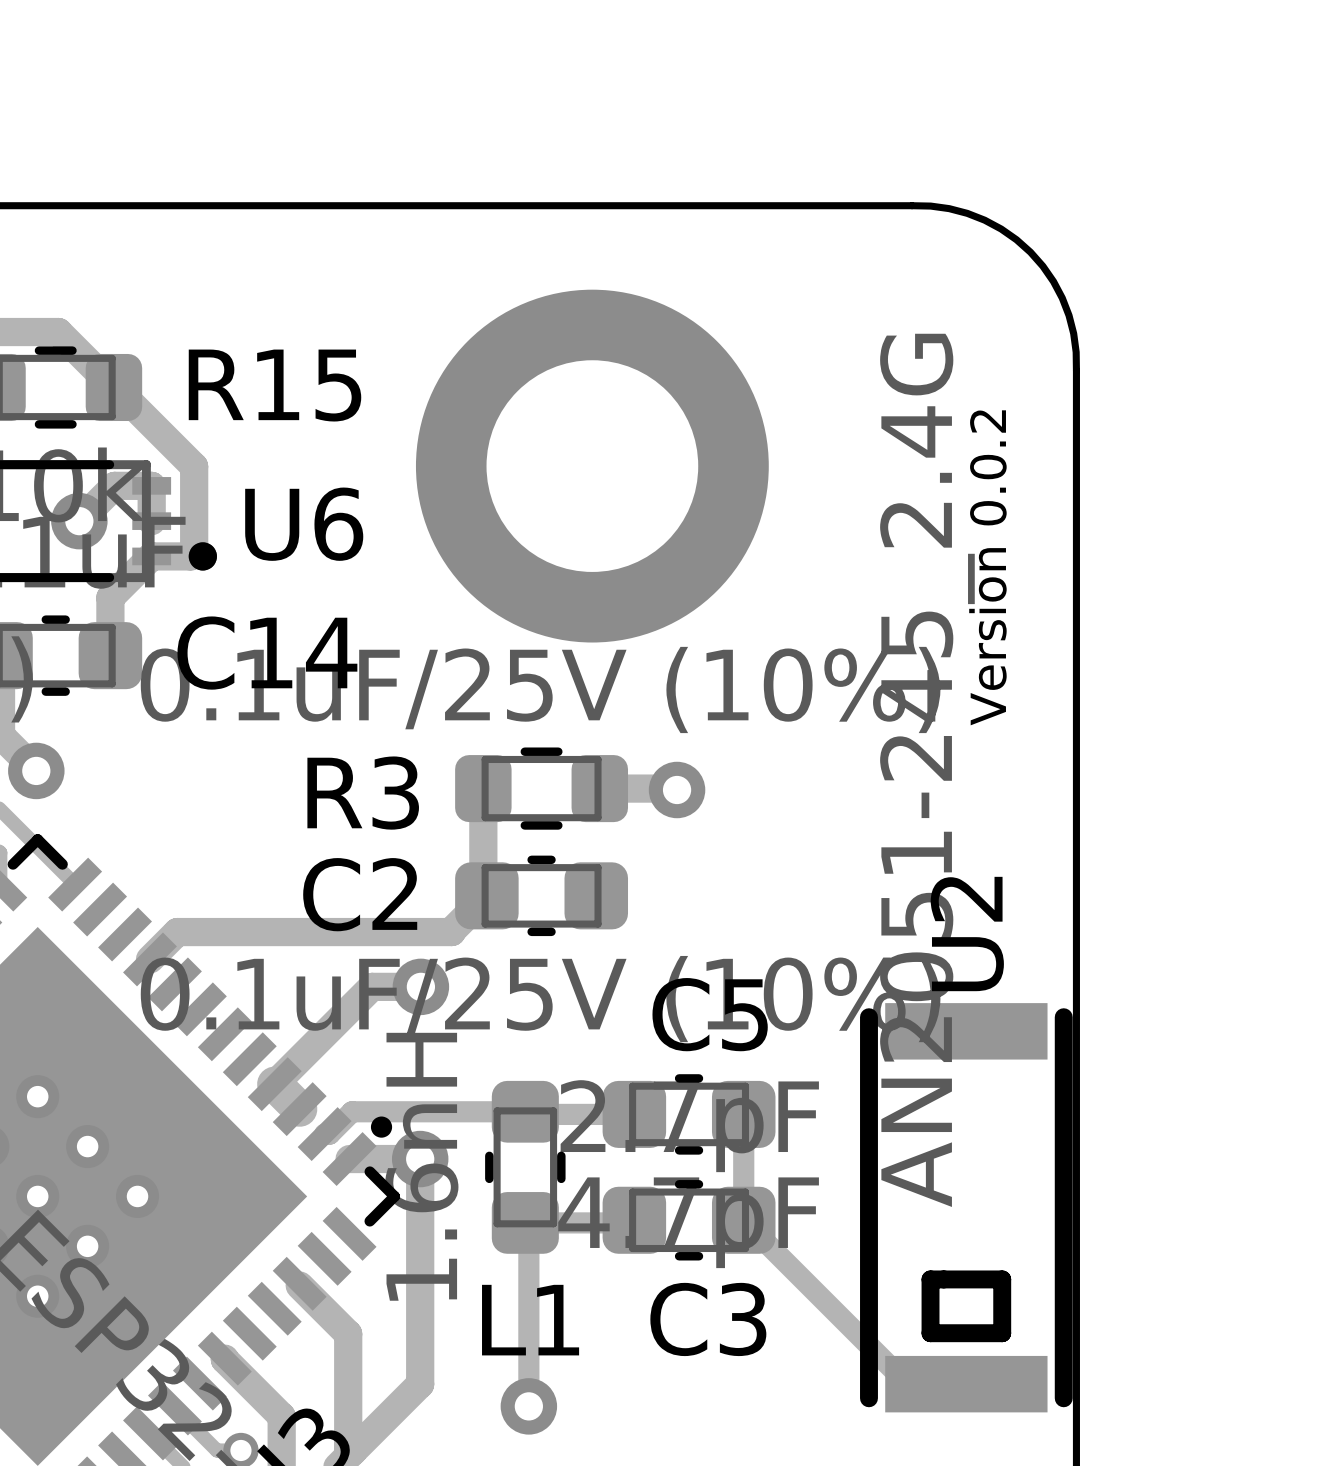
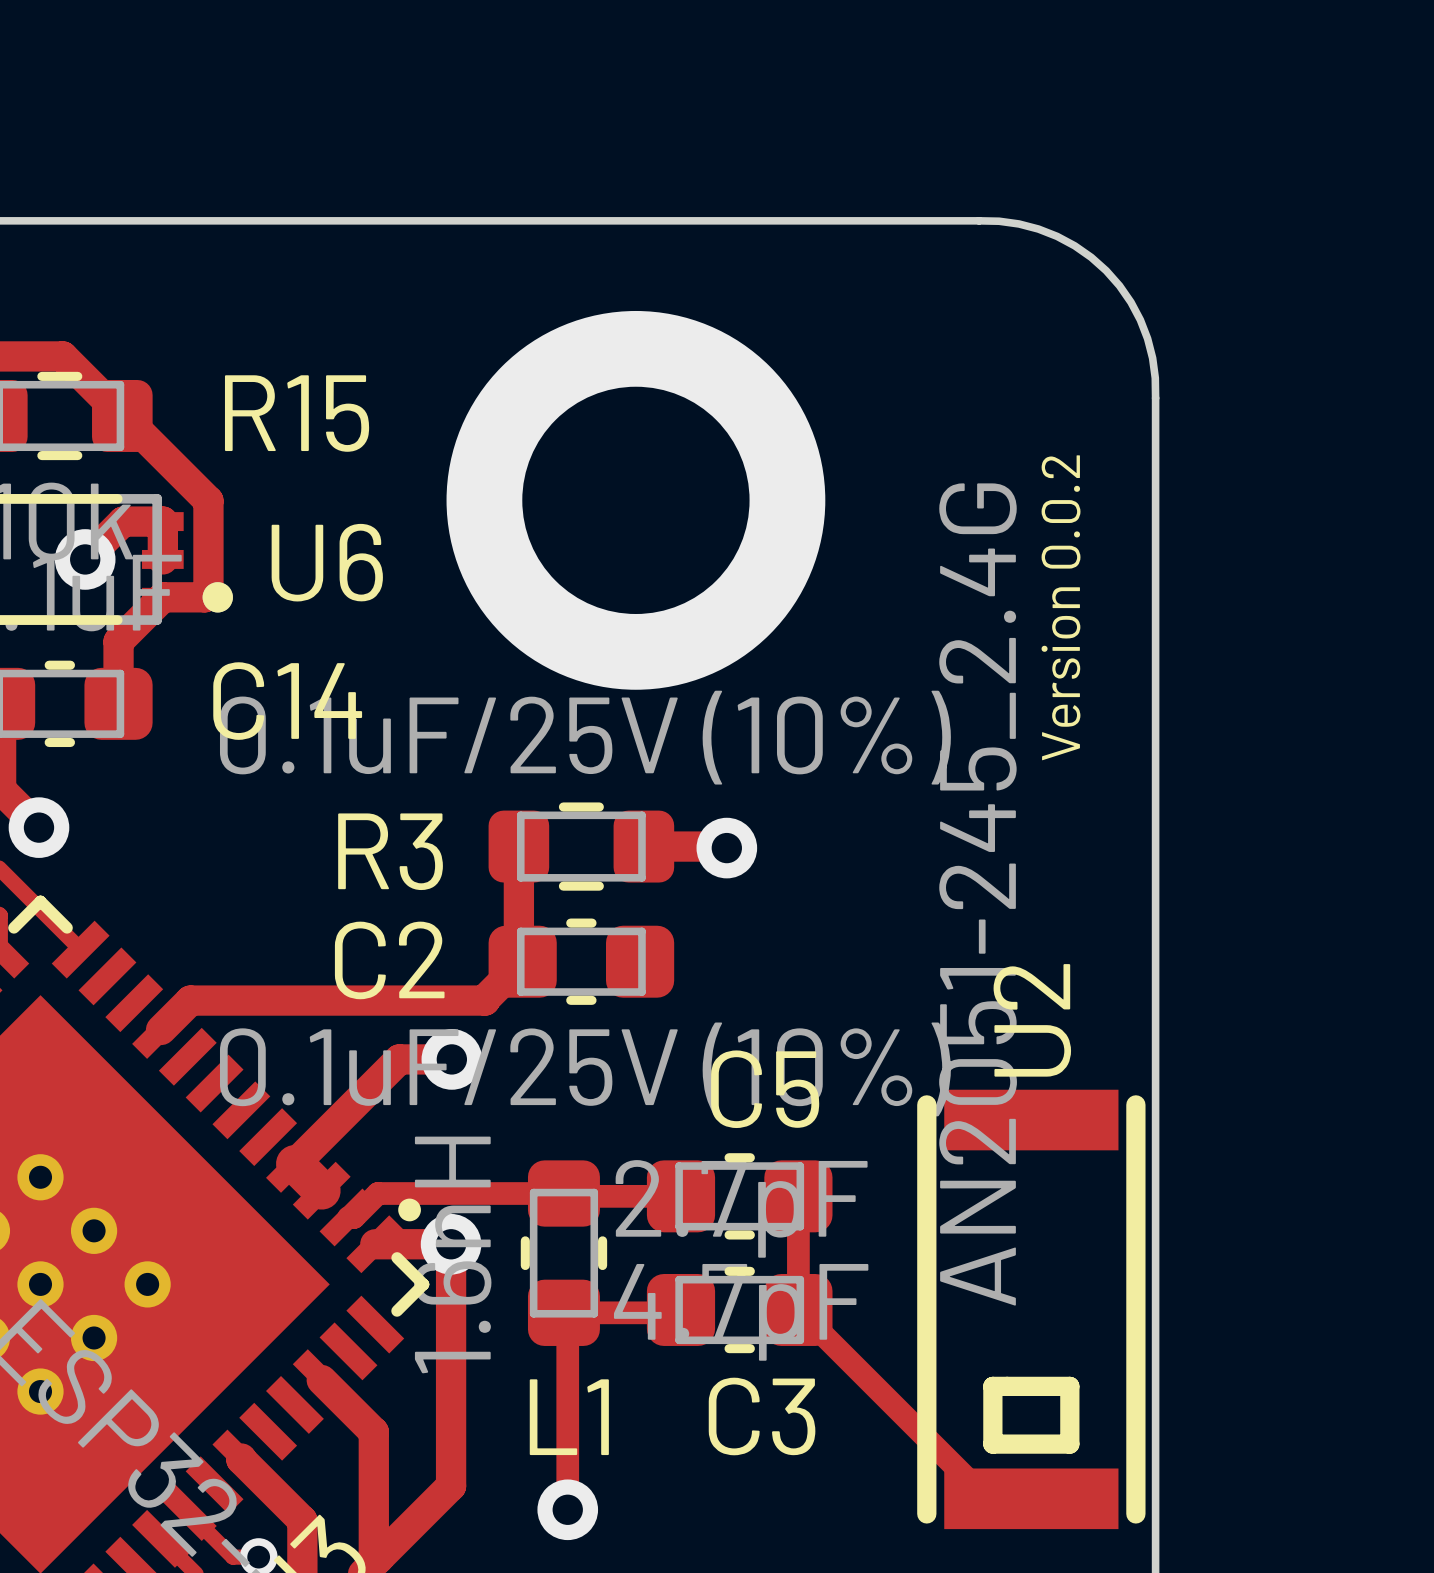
U2 position: (966, 1207) -> (1031, 1309)

